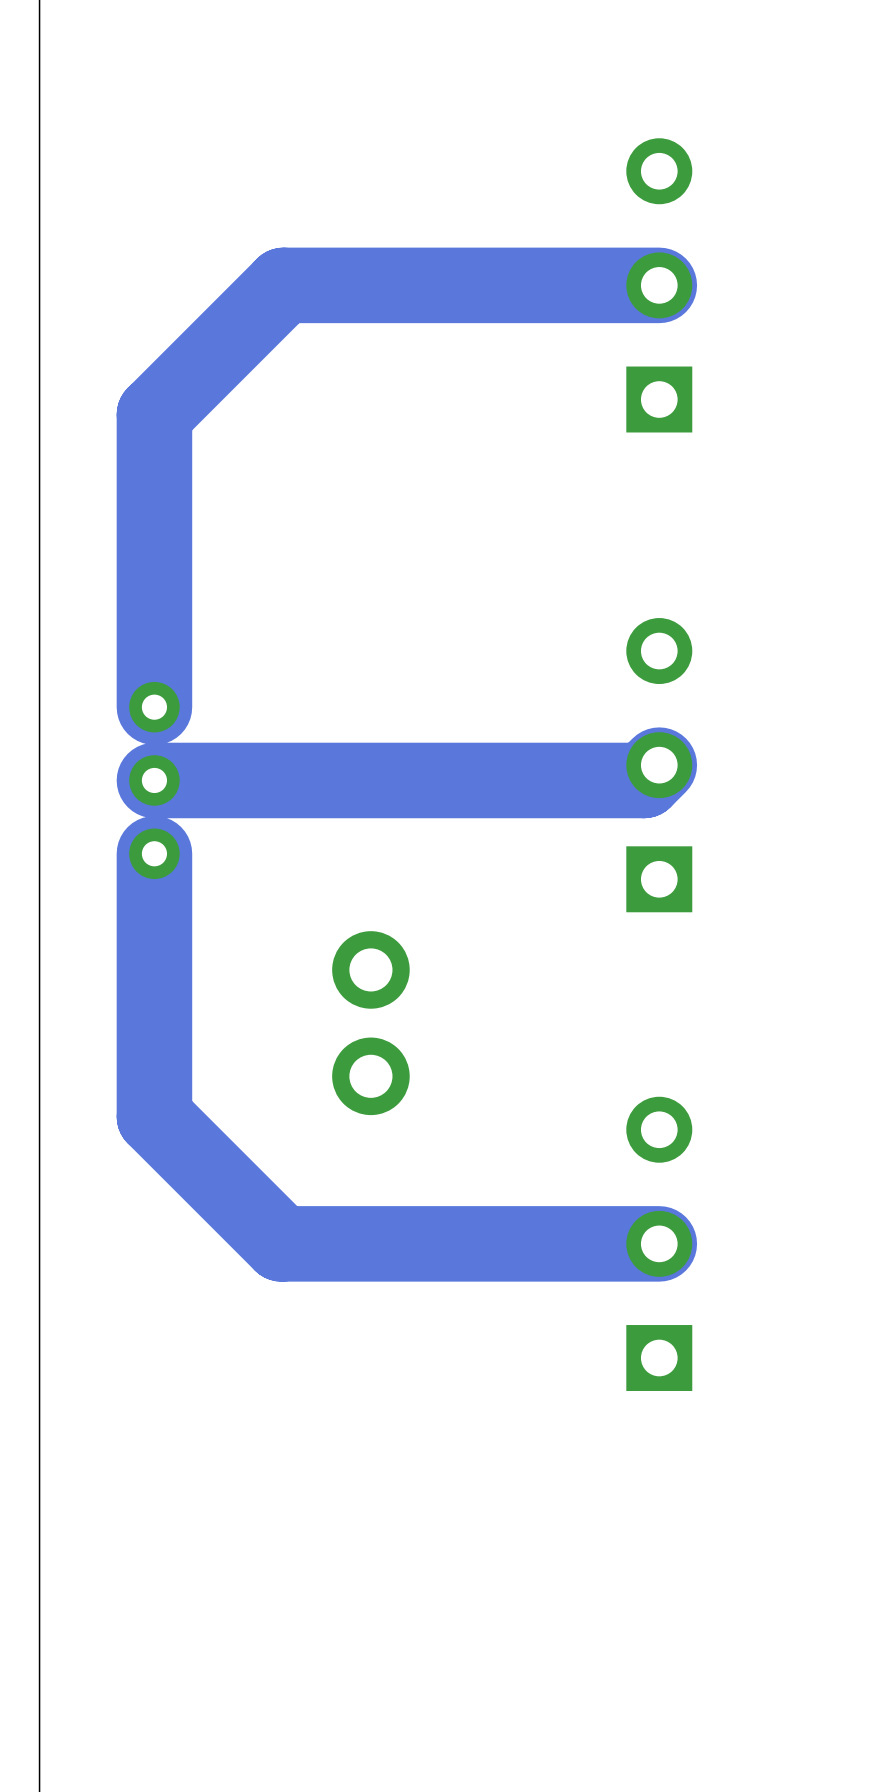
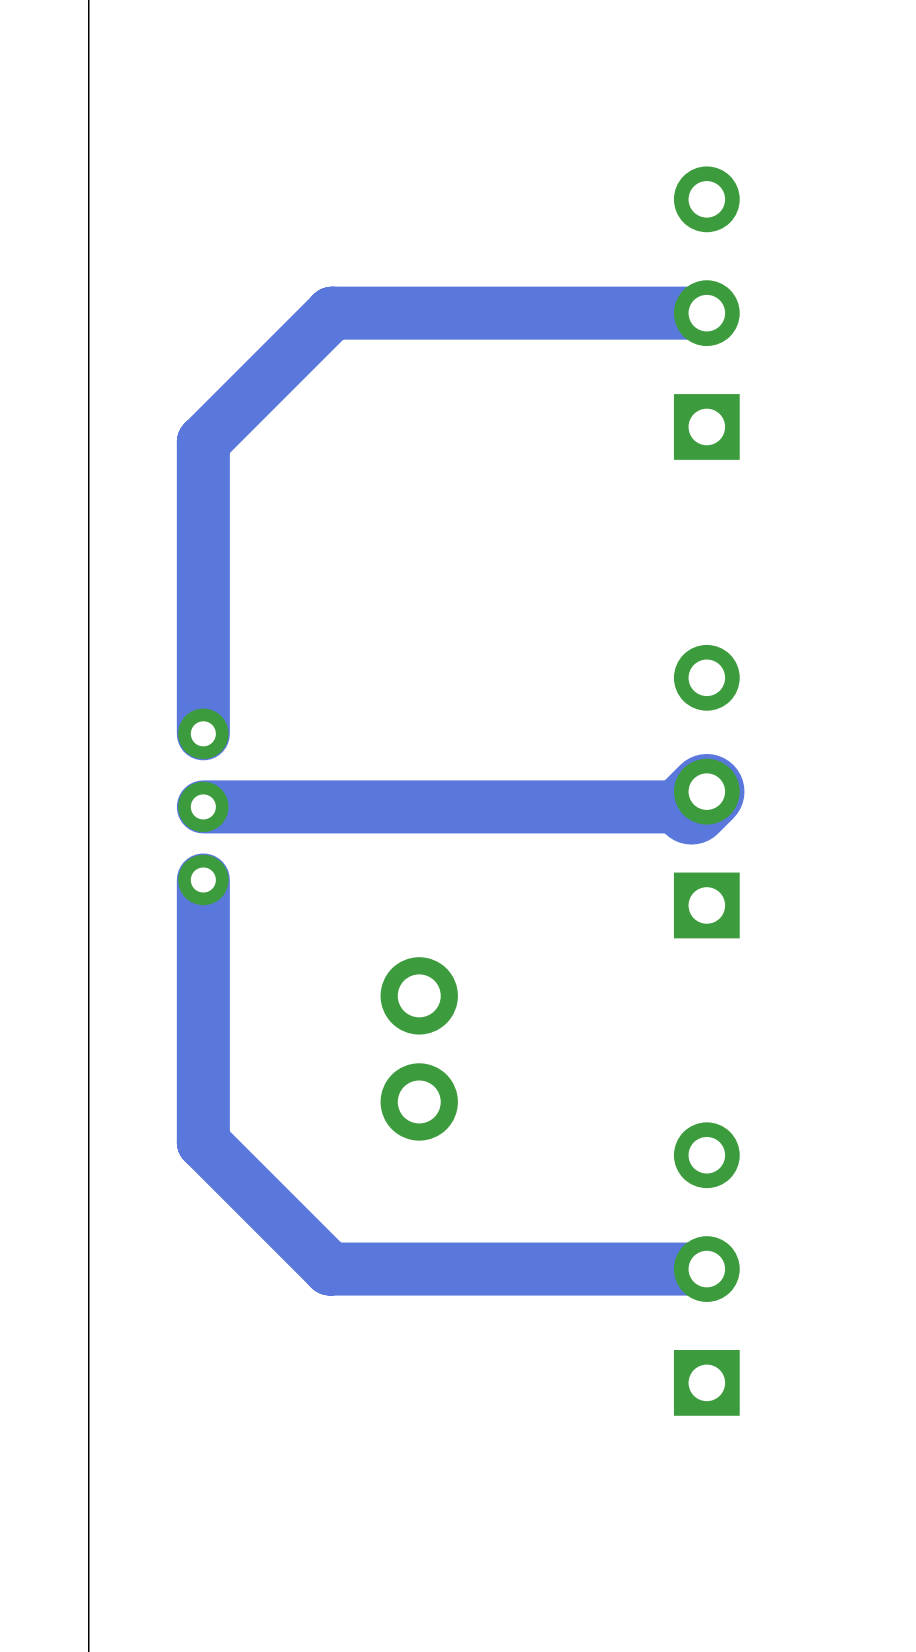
track width: thick (659, 285) (283, 285) (154, 414) (154, 707) -> thin (706, 313) (332, 313) (203, 442) (203, 733)
track width: thick (643, 780) (154, 780) -> thin (691, 806) (203, 806)
track width: thick (154, 853) (154, 1116) (281, 1243) (659, 1243) -> thin (203, 880) (203, 1142) (330, 1269) (706, 1269)

